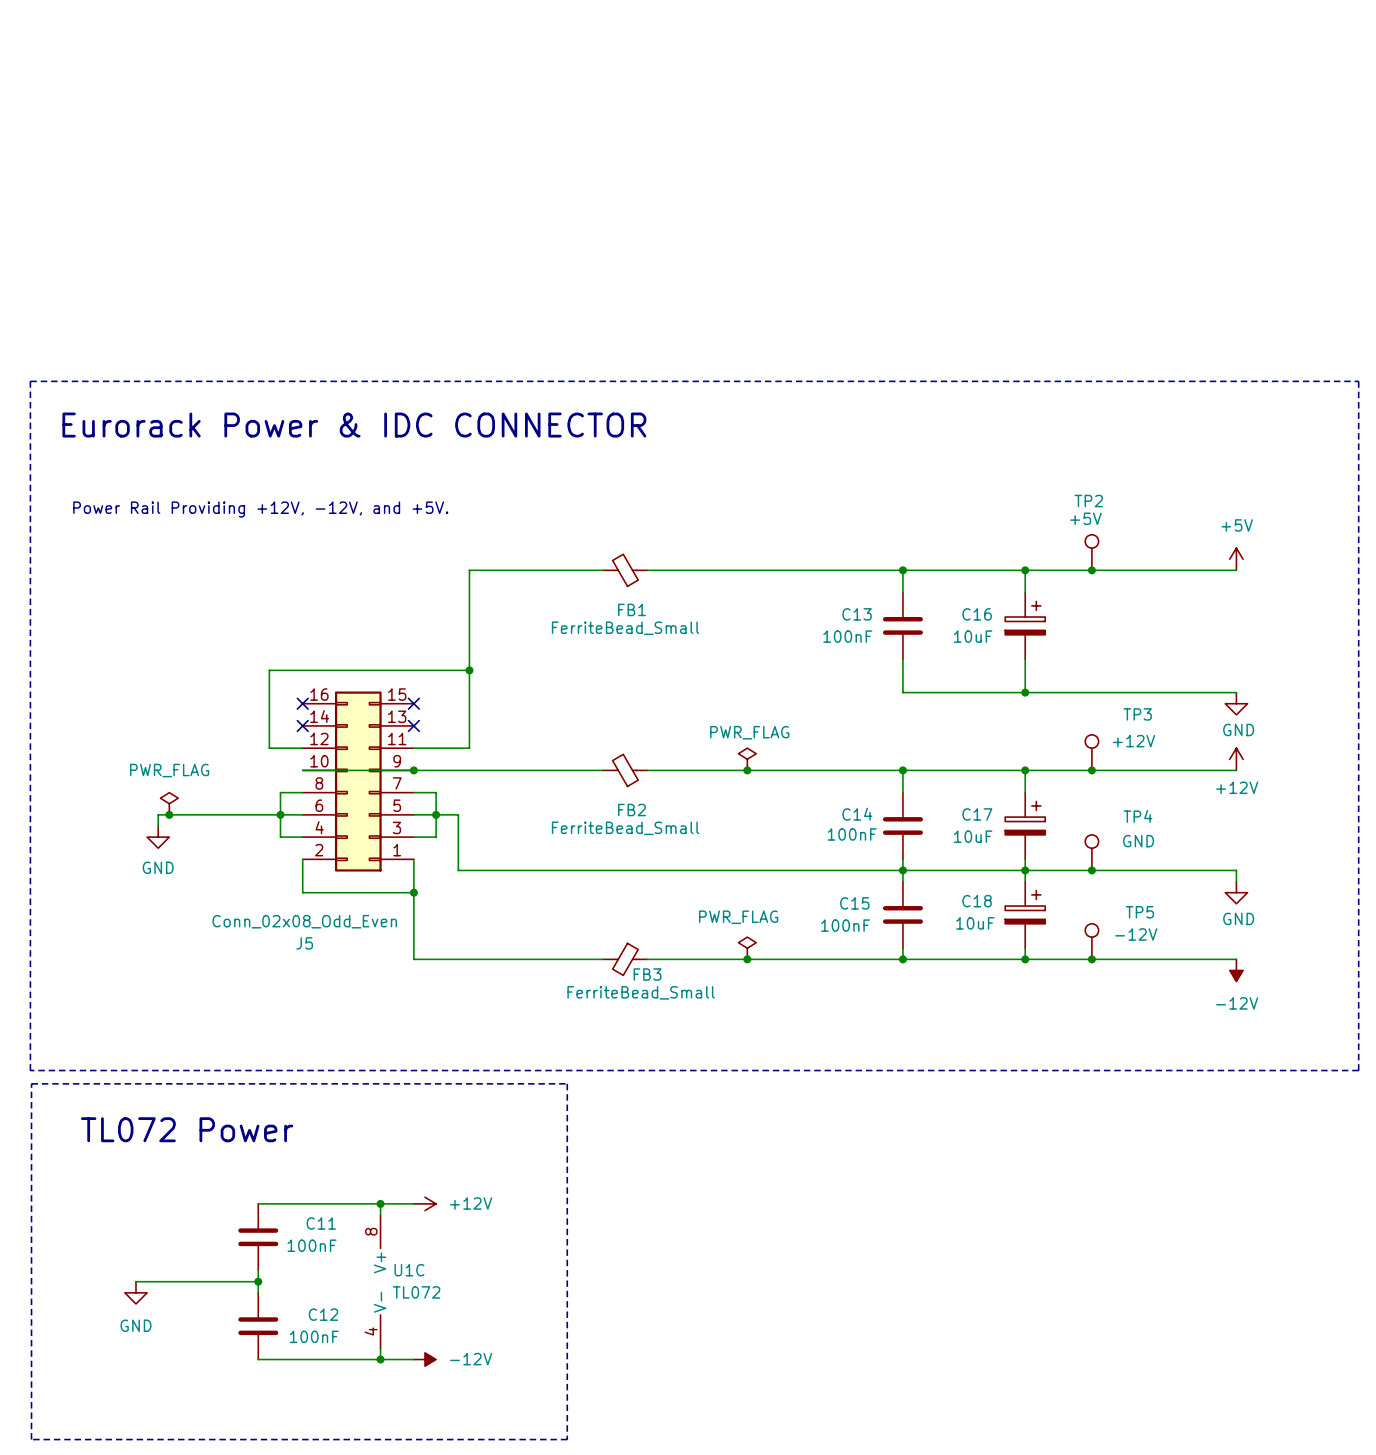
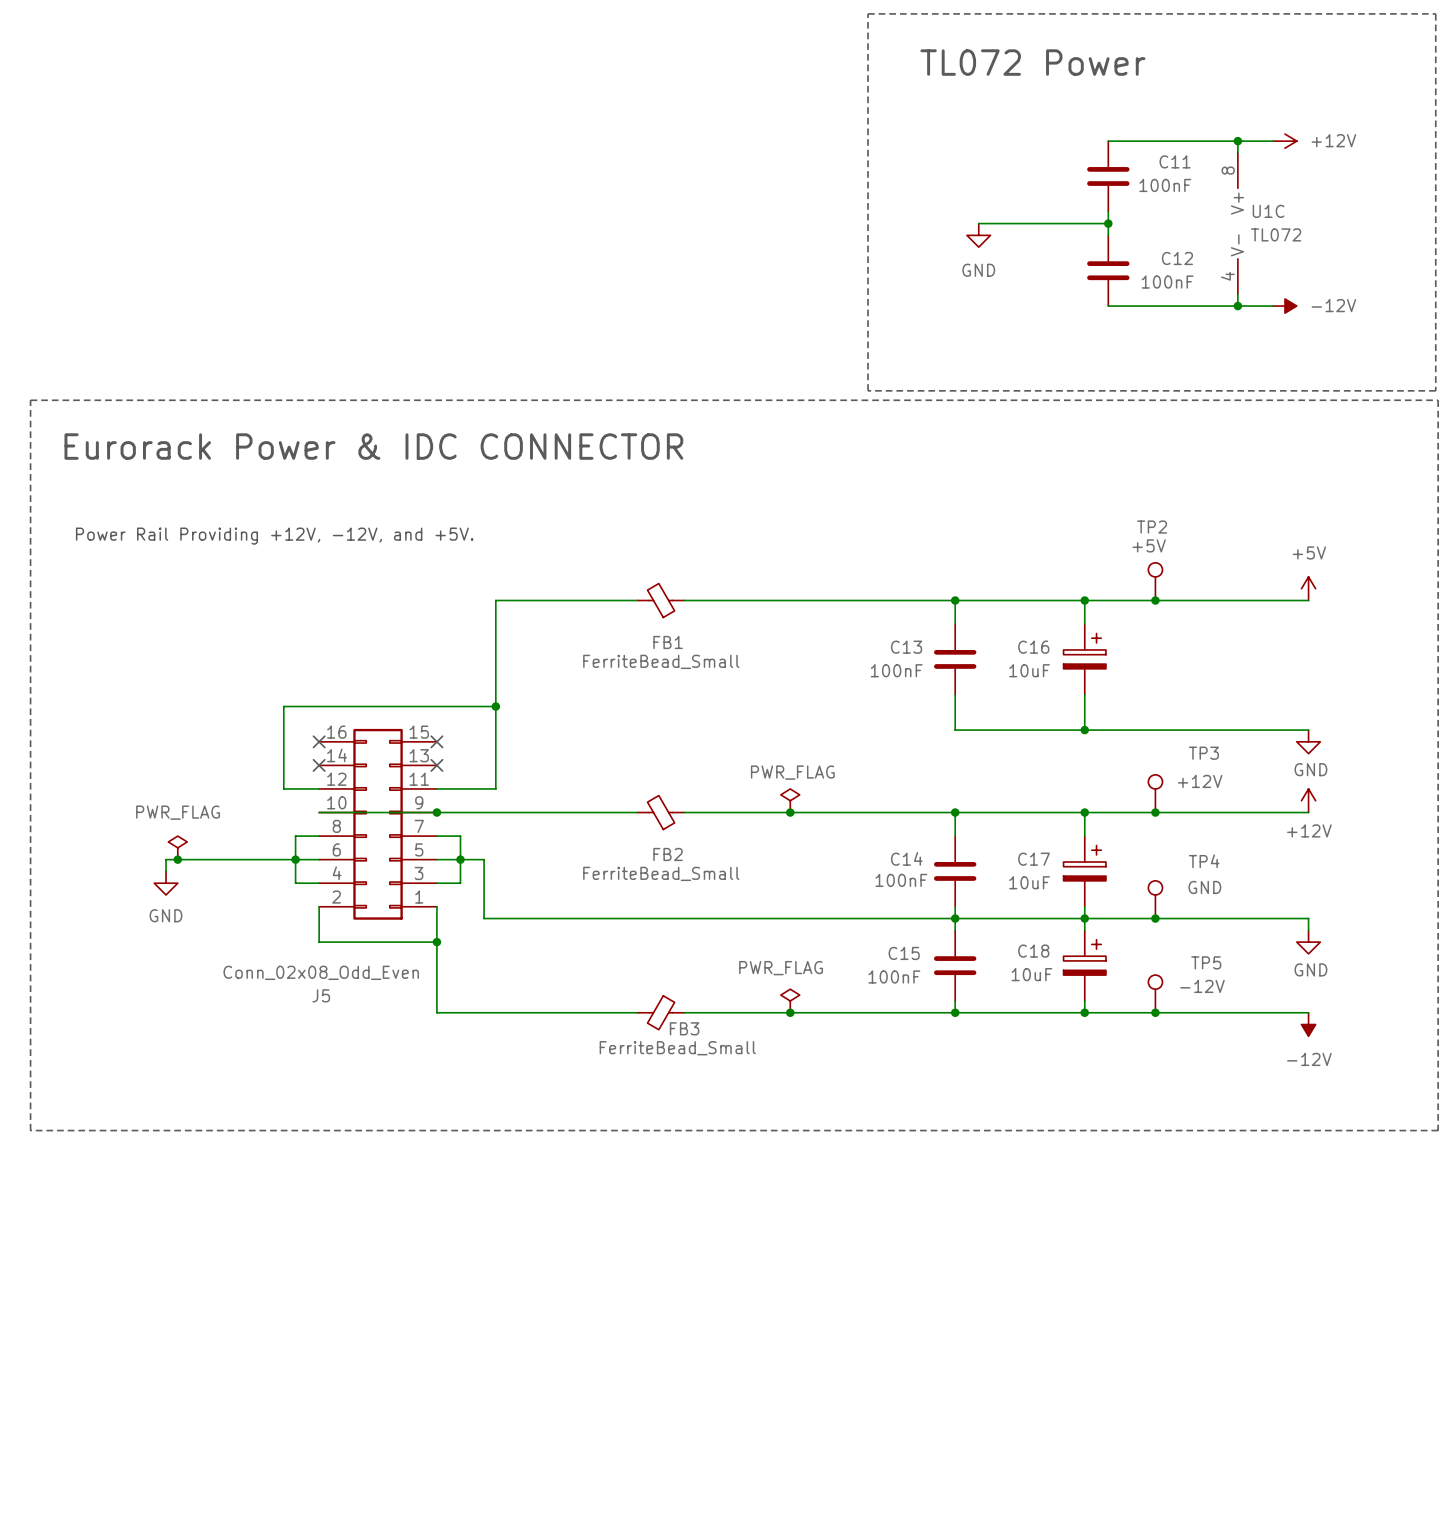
line: none -> (868, 13) (1435, 13) (1435, 390) (868, 390) (868, 13)
text: none -> TL072 Power (1032, 62)
wire: none -> (1108, 141) (1273, 141)
wire: none -> (1237, 141) (1237, 152)
junction: none -> (1237, 141)
power symbol: none -> +12V (1284, 141)
wire: none -> (1108, 211) (1108, 235)
wire: none -> (978, 223) (1108, 223)
junction: none -> (1108, 223)
power symbol: none -> GND (978, 235)
wire: none -> (1237, 294) (1237, 306)
wire: none -> (1108, 306) (1273, 306)
junction: none -> (1237, 306)
power symbol: none -> -12V (1284, 306)
line: (31, 1083) (567, 1083) (567, 1439) (31, 1439) (31, 1083) -> none
text: TL072 Power (187, 1129) -> none
wire: (258, 1203) (413, 1203) -> none
wire: (380, 1203) (380, 1215) -> none
junction: (380, 1203) -> none
power symbol: +12V (424, 1203) -> none
C11 position: (258, 1237) -> (1108, 176)
wire: (258, 1270) (258, 1292) -> none
wire: (136, 1281) (258, 1281) -> none
junction: (258, 1281) -> none
U1C position: (380, 1281) -> (1237, 223)
power symbol: GND (136, 1292) -> none
C12 position: (258, 1326) -> (1108, 270)
wire: (380, 1348) (380, 1359) -> none
wire: (258, 1359) (413, 1359) -> none
junction: (380, 1359) -> none
power symbol: -12V (424, 1359) -> none

